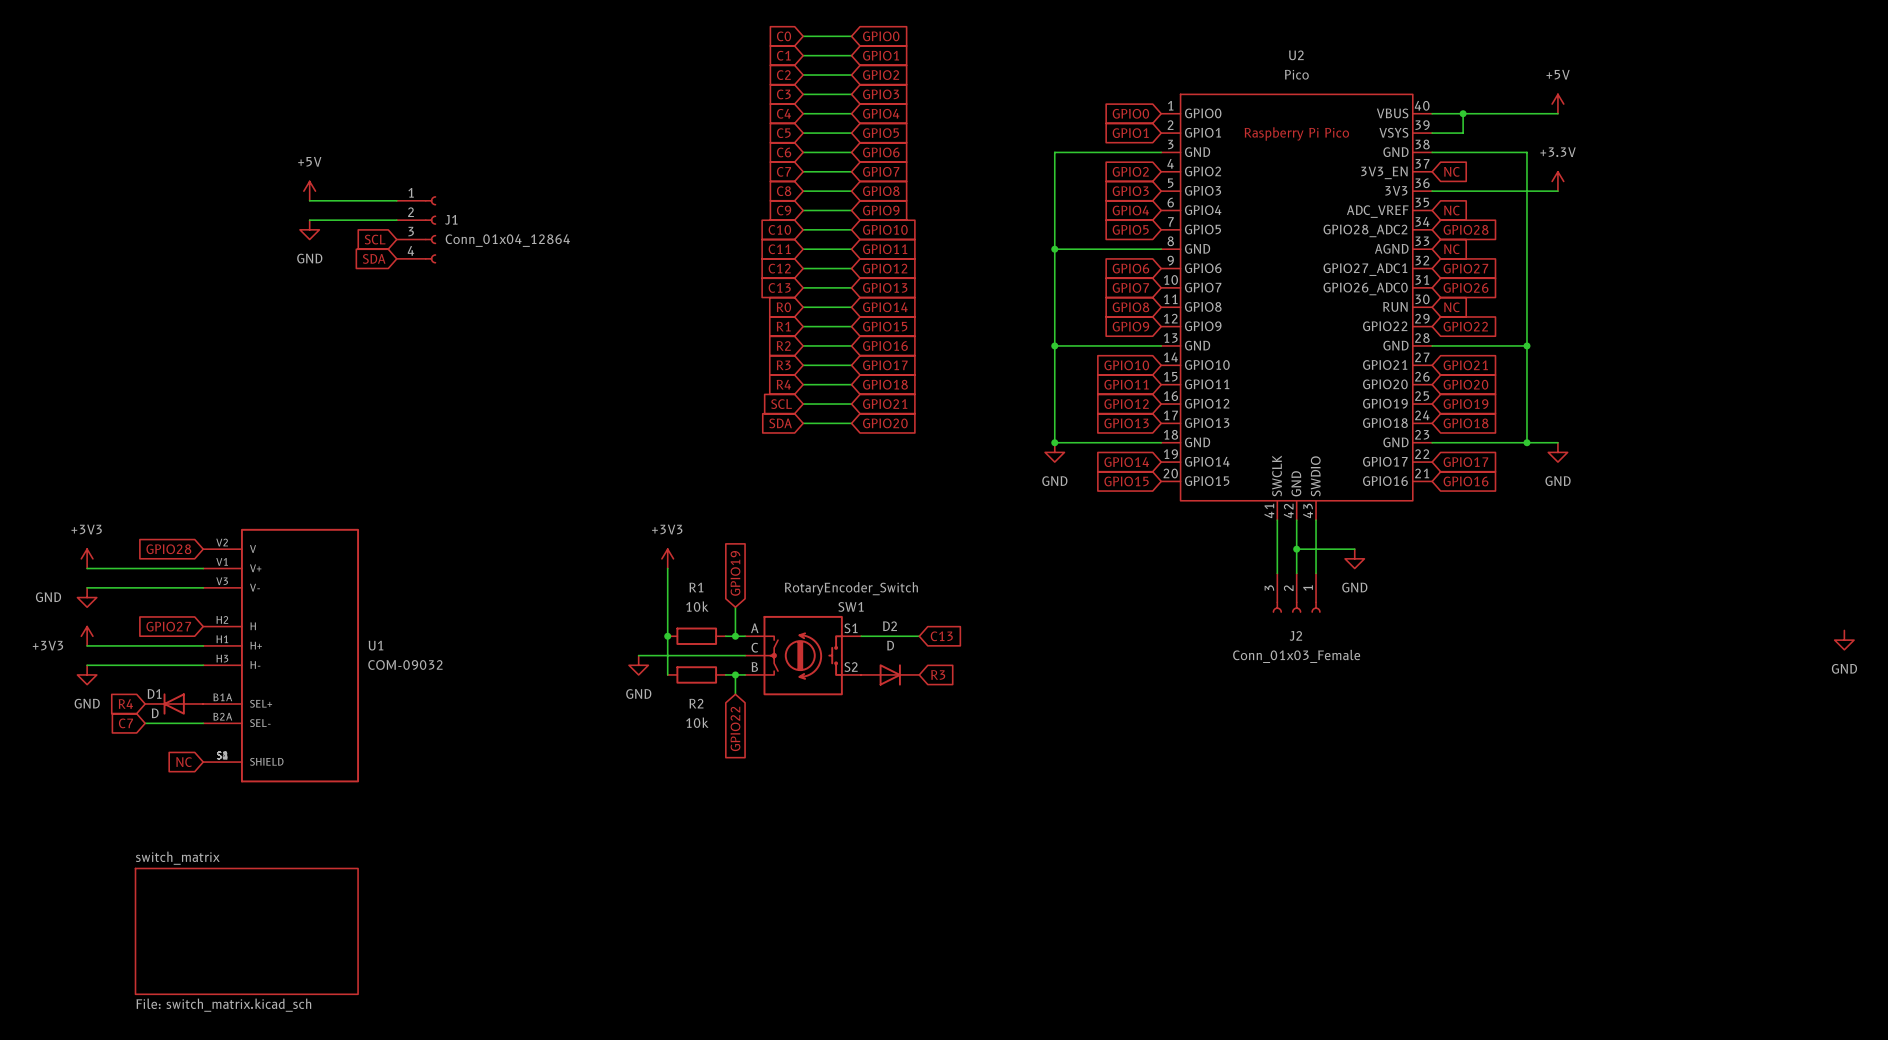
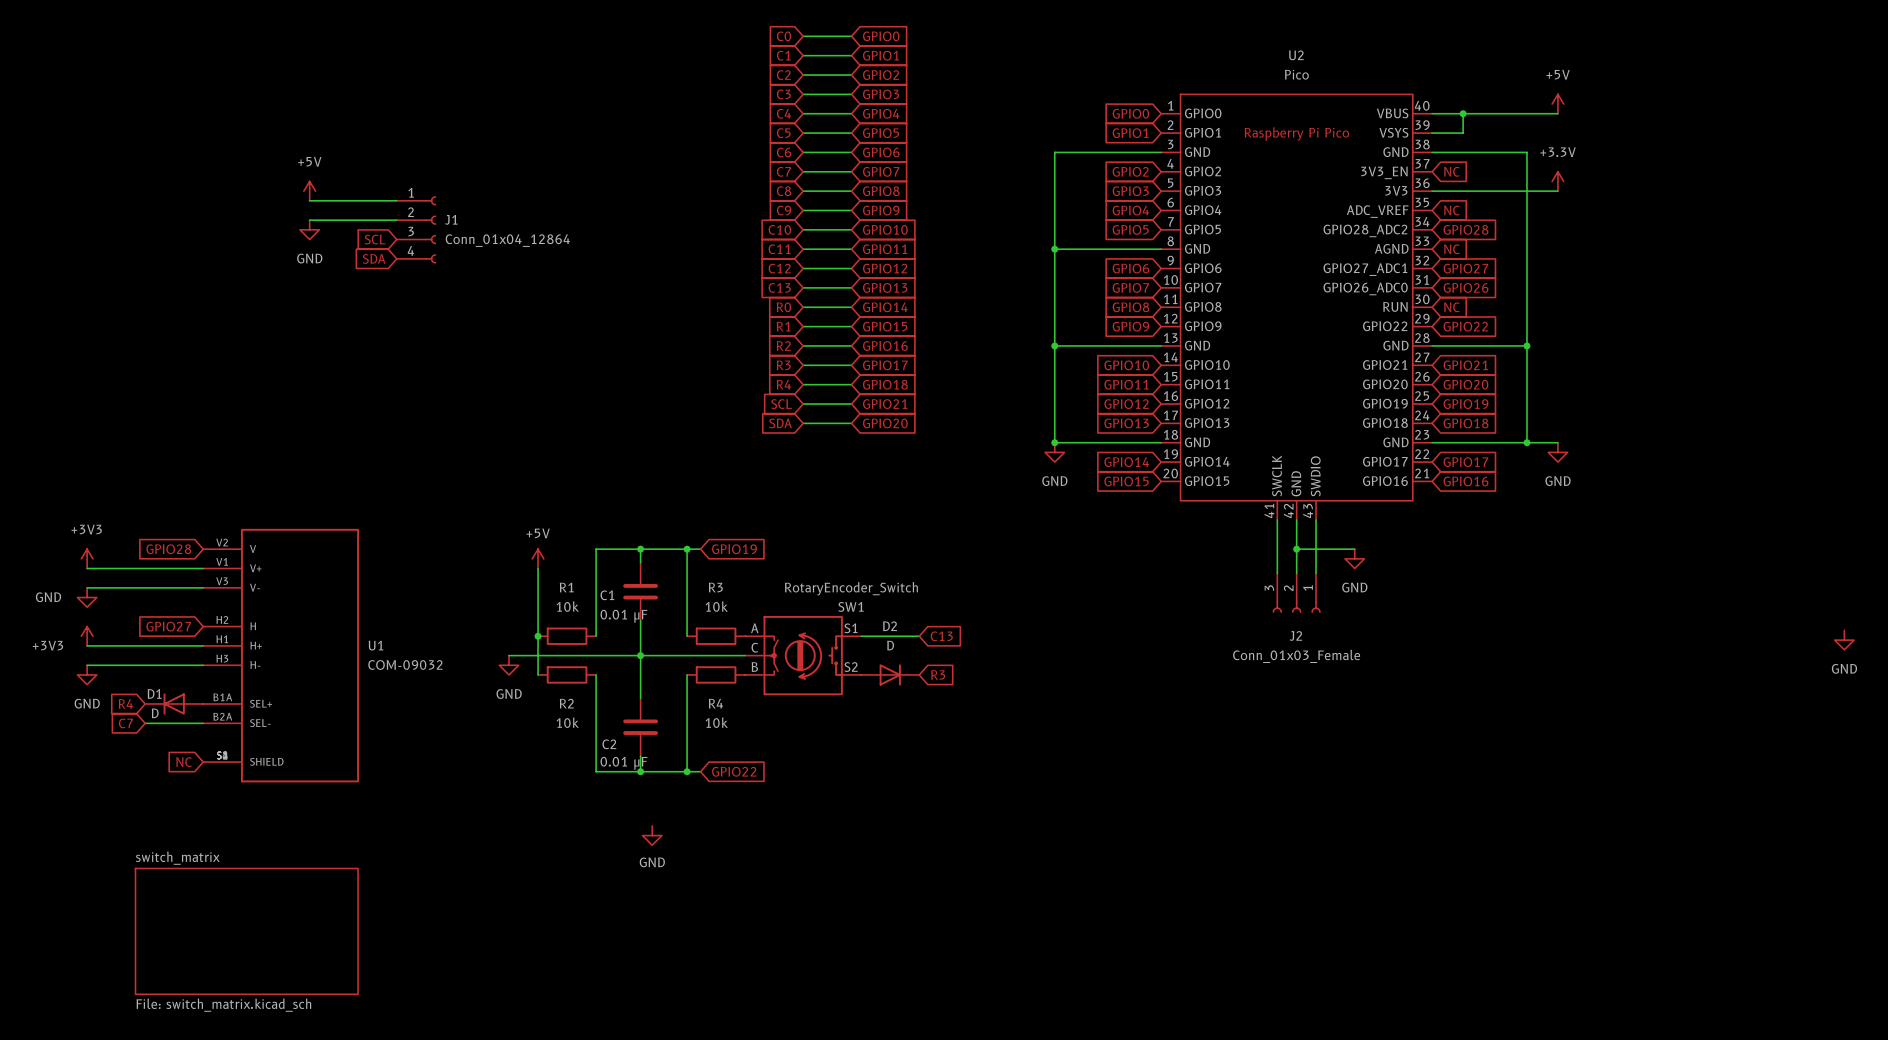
wire: none -> (640, 549) (640, 562)
junction: none -> (640, 549)
wire: none -> (687, 549) (687, 636)
junction: none -> (687, 549)
wire: none -> (700, 549) (596, 549) (596, 636)
power symbol: none -> +5V (538, 558)
power symbol: +3V3 (667, 558) -> none
wire: (667, 568) (667, 674) -> (538, 568) (538, 674)
global label rotation: 0° (735, 573) -> 90° clockwise (734, 549)
C1: none -> 0.01 μF (640, 591)
wire: (735, 607) (735, 636) -> none
wire: none -> (640, 620) (640, 698)
junction: none -> (538, 636)
junction position: (667, 636) -> (640, 655)
R1 position: (696, 636) -> (567, 636)
R3: none -> 10k (716, 636)
junction: (735, 636) -> none
wire: none -> (509, 655) (638, 655)
power symbol: none -> GND (509, 665)
power symbol: GND (638, 665) -> none
wire: none -> (596, 674) (596, 771) (700, 771)
wire: none -> (687, 674) (687, 771)
R2 position: (696, 674) -> (567, 674)
R4: none -> 10k (716, 674)
wire: (735, 674) (735, 694) -> none
junction: (735, 674) -> none
C2: none -> 0.01 μF (640, 727)
global label rotation: 0° (735, 728) -> 90° counterclockwise (734, 771)
wire: none -> (640, 756) (640, 771)
junction: none -> (640, 771)
junction: none -> (687, 771)
power symbol: none -> GND (652, 835)

